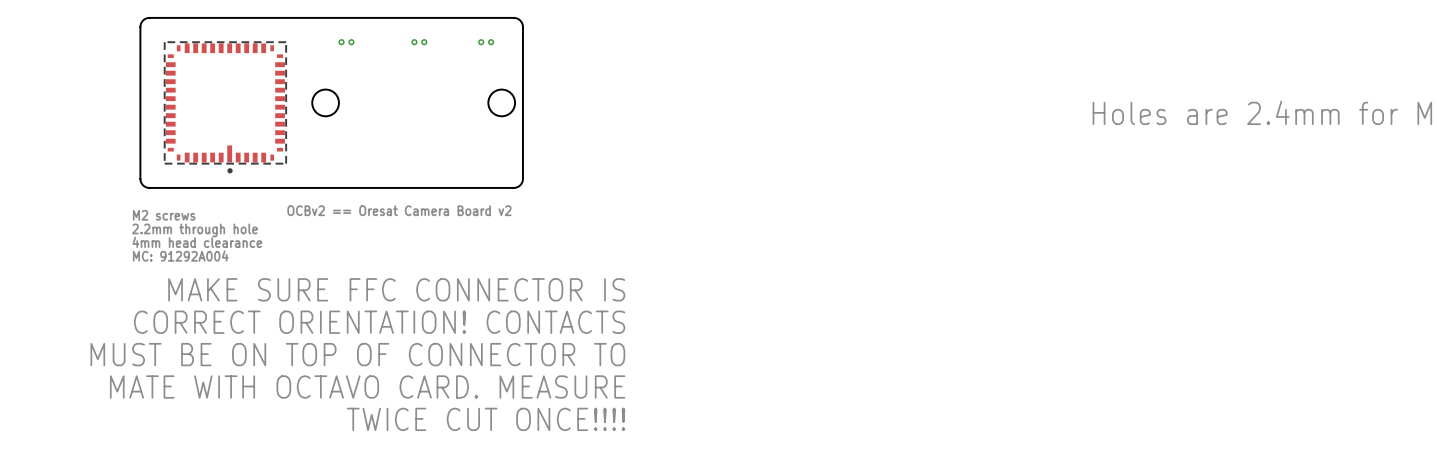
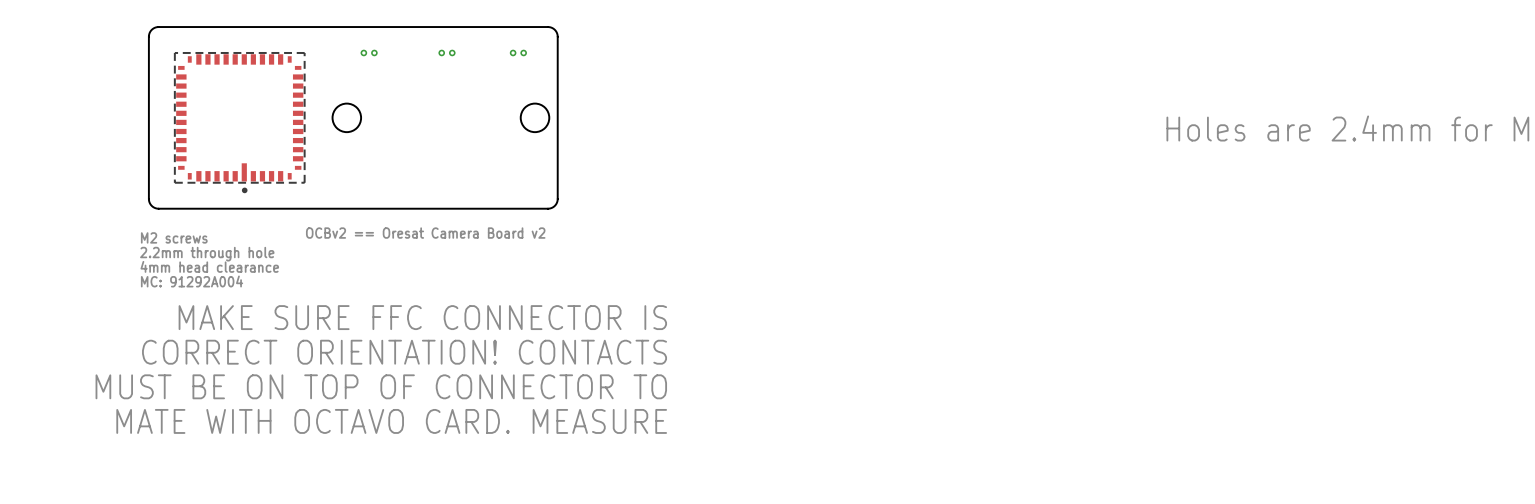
text: TWICE CUT ONCE!!!! (486, 419) -> none

